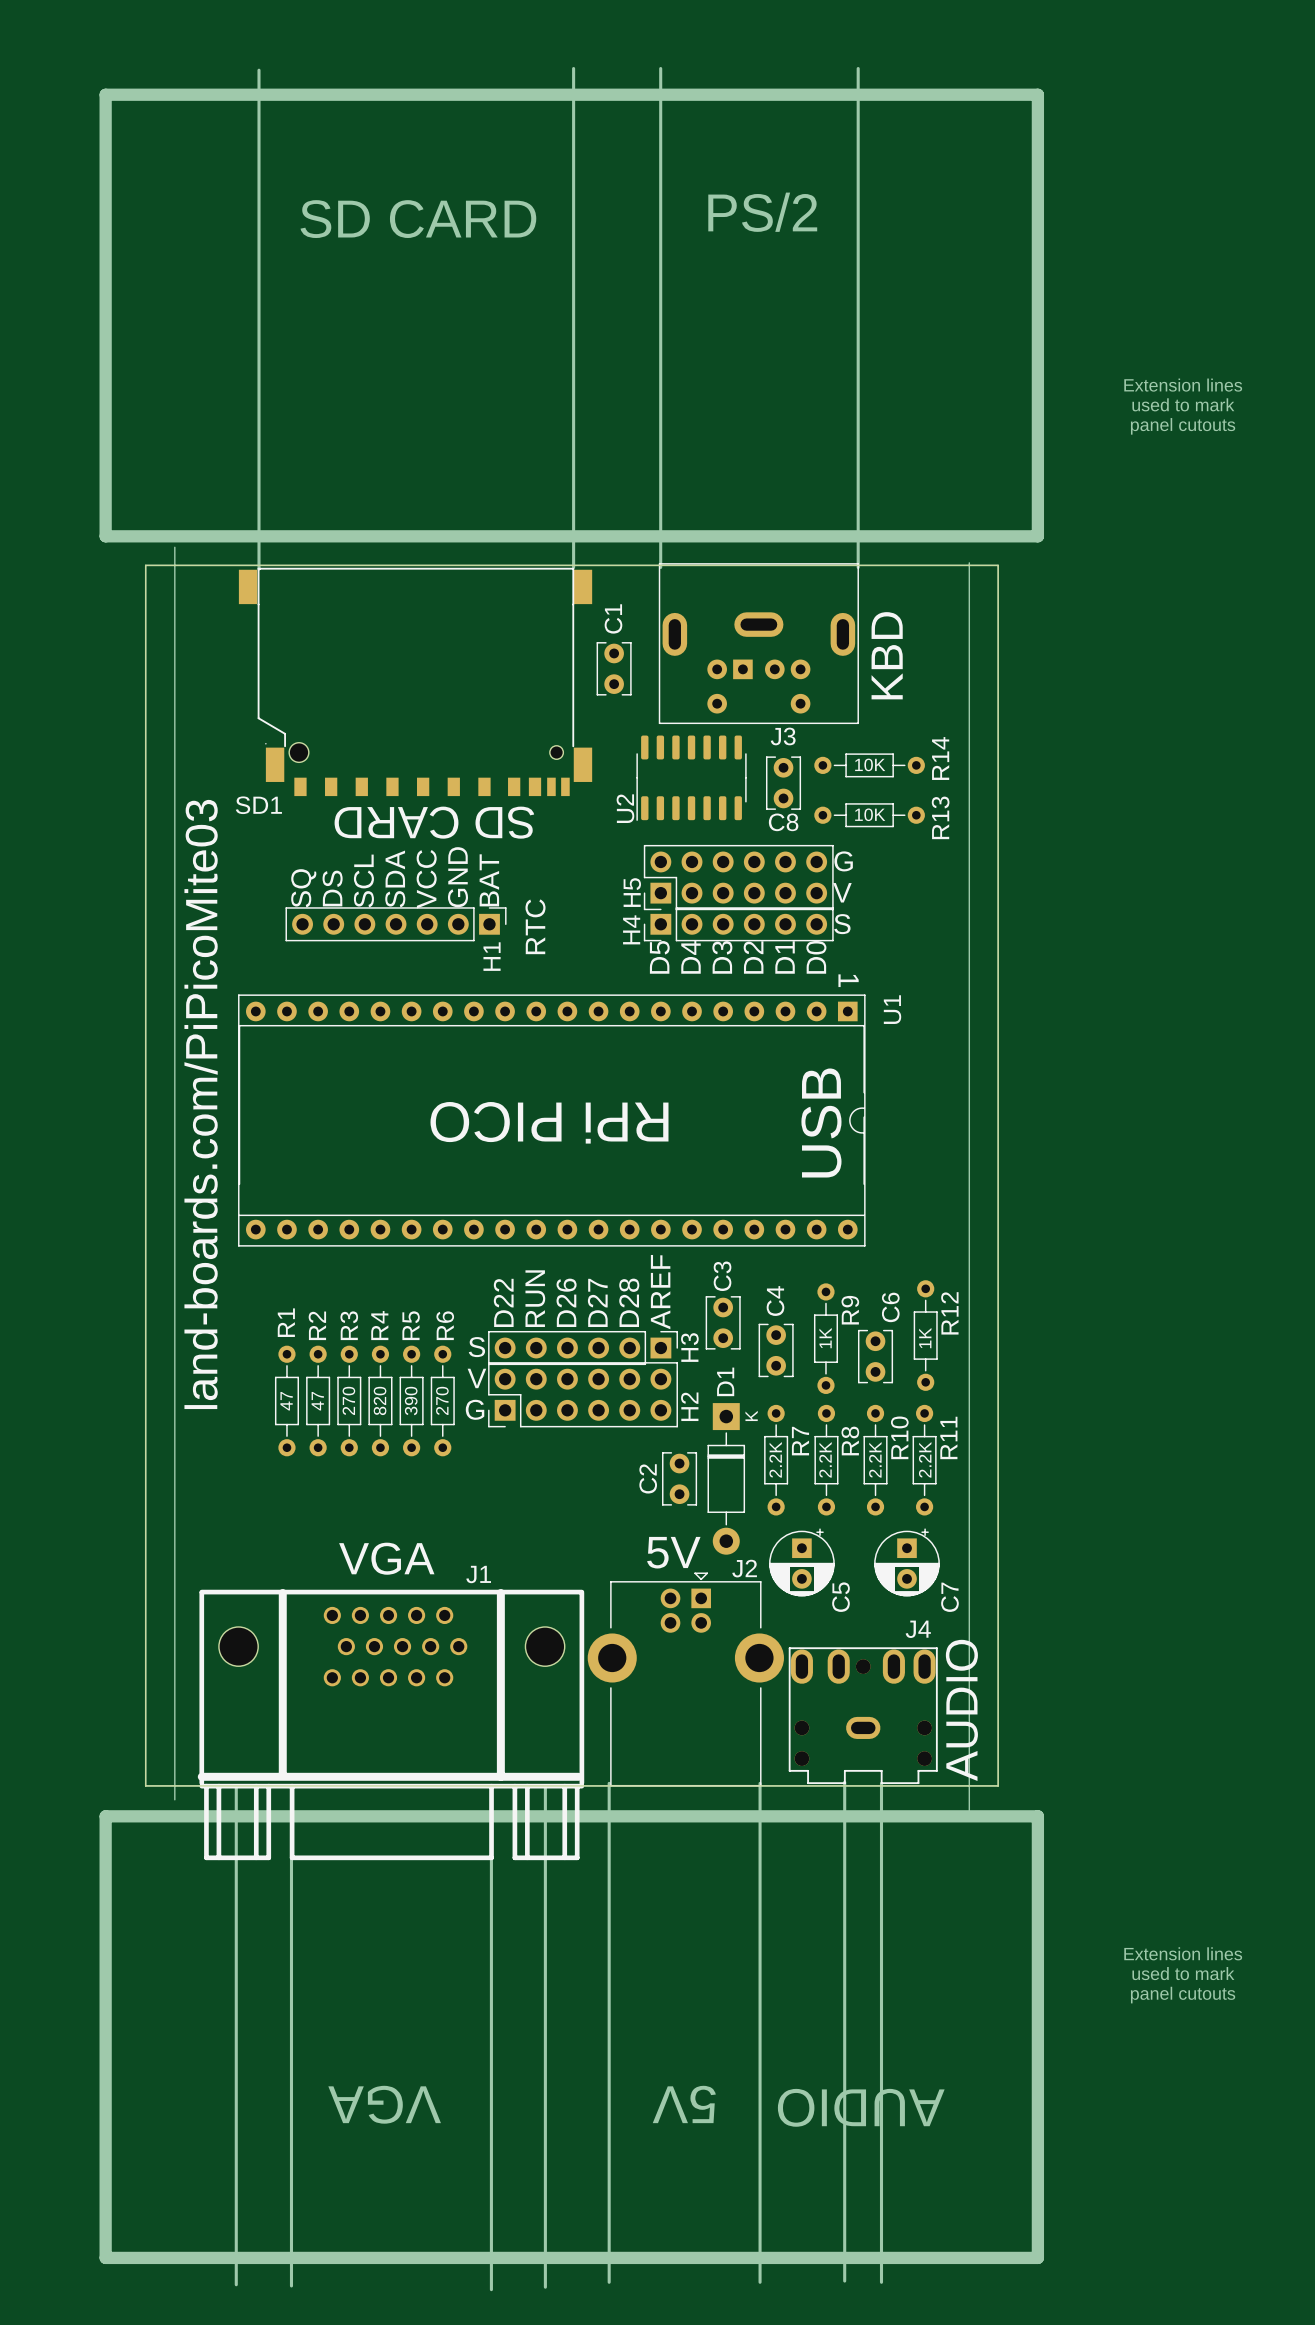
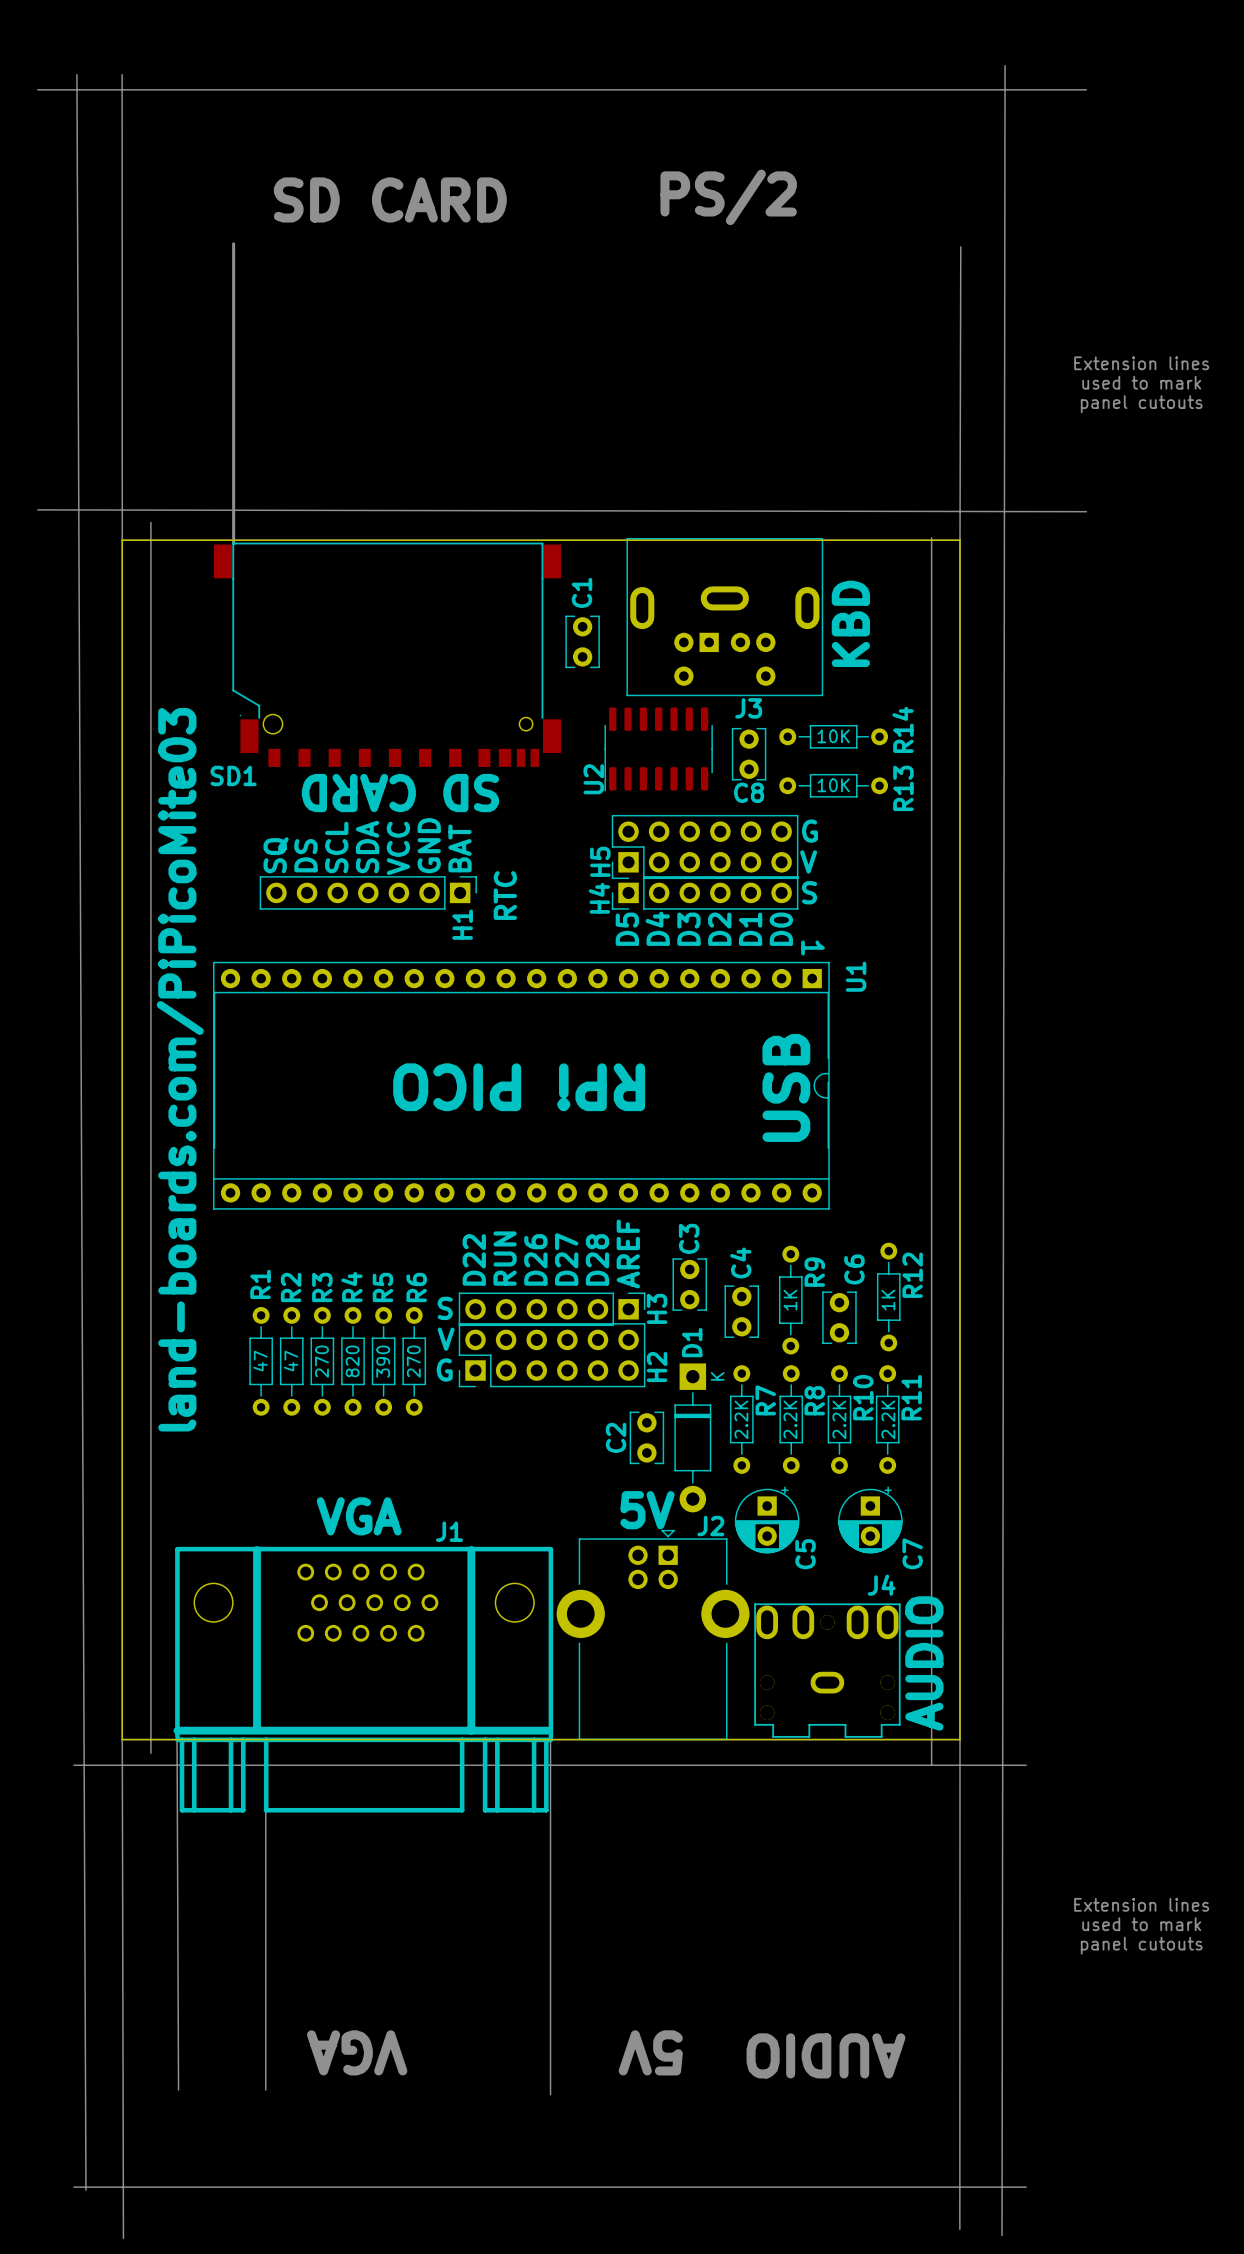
line: (573, 68) (573, 567) -> none
line: (660, 68) (660, 567) -> none
line: (858, 68) (858, 567) -> none
line: (259, 70) (259, 263) -> none
line: none -> (1005, 65) (1002, 2235)
line: none -> (76, 74) (85, 2190)
line: none -> (122, 74) (122, 540)
line: (105, 94) (1037, 94) (1037, 536) (105, 536) (105, 94) -> none
line: none -> (37, 89) (1086, 89)
line: none -> (960, 246) (960, 540)
line: none -> (37, 509) (1086, 511)
line: none -> (177, 1730) (178, 2090)
line: none -> (550, 1736) (550, 2094)
line: (844, 1782) (844, 2281) -> none
line: (609, 1783) (609, 2282) -> none
line: (760, 1783) (760, 2282) -> none
line: (881, 1783) (881, 2282) -> none
line: none -> (122, 1739) (123, 2238)
line: (236, 1785) (236, 2284) -> none
line: none -> (960, 1739) (959, 2229)
line: (291, 1787) (291, 2285) -> (265, 1740) (265, 2090)
line: (545, 1788) (545, 2287) -> none
line: (491, 1790) (491, 2289) -> none
line: none -> (73, 1765) (1026, 1765)
line: (105, 1816) (105, 2257) (1037, 2257) (1037, 1816) (105, 1816) -> none
line: none -> (73, 2187) (1026, 2187)

